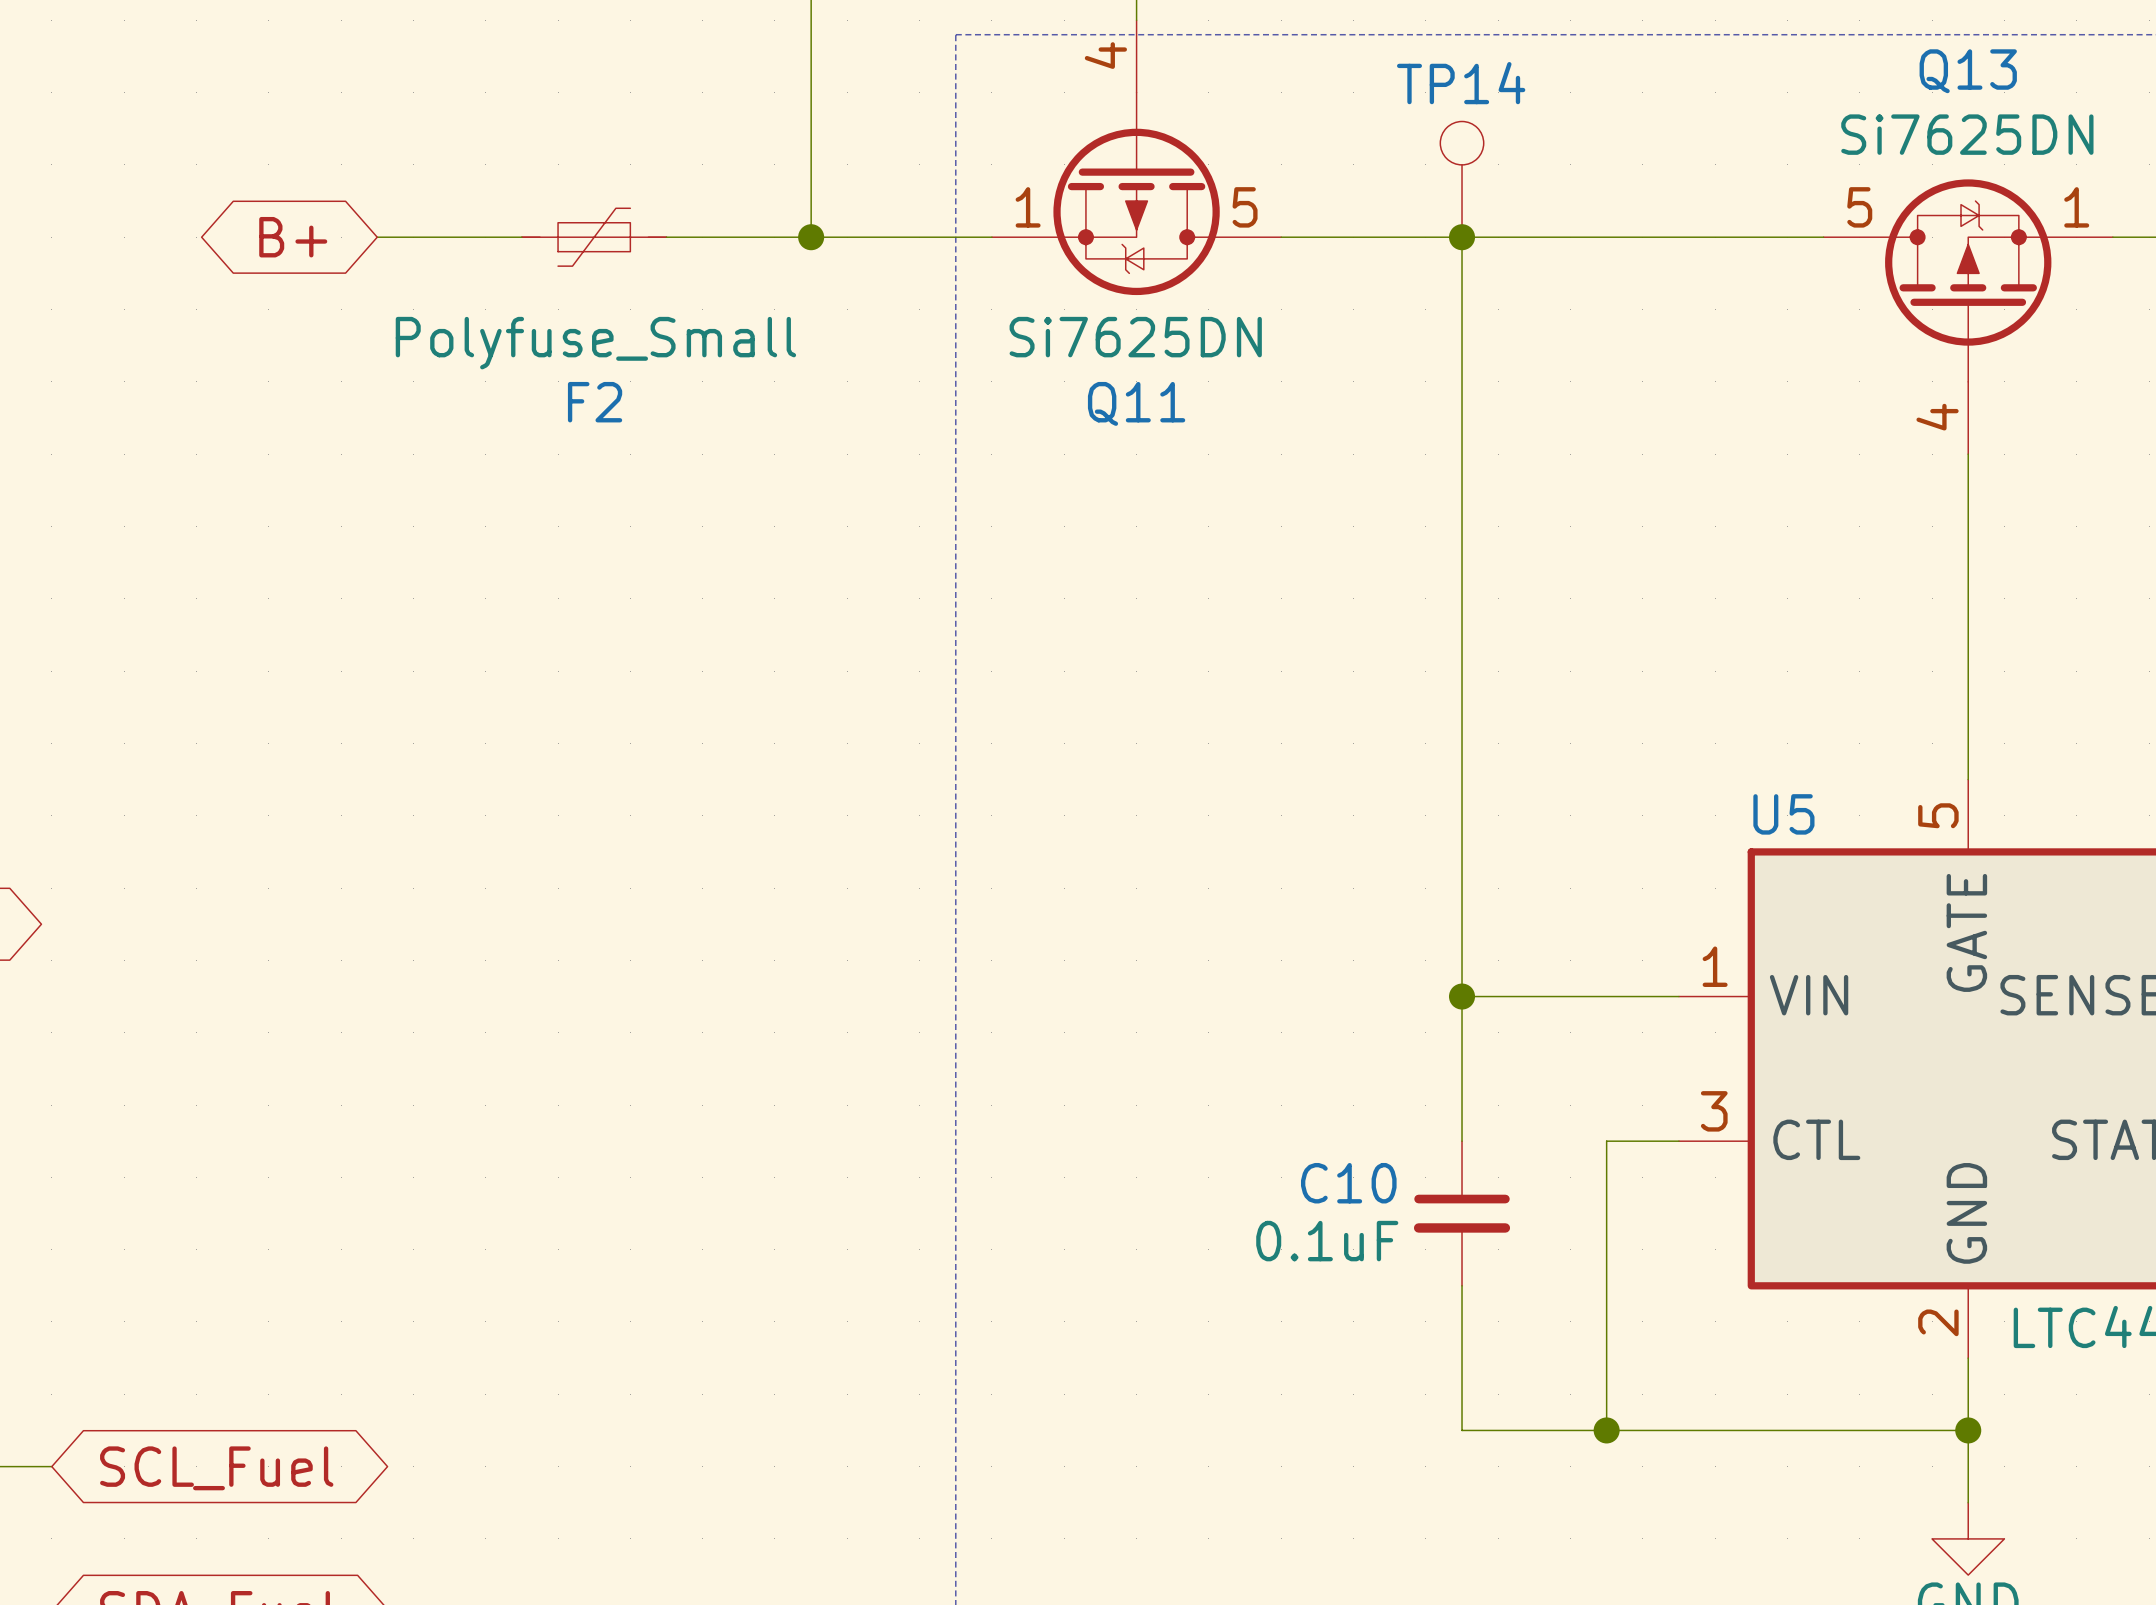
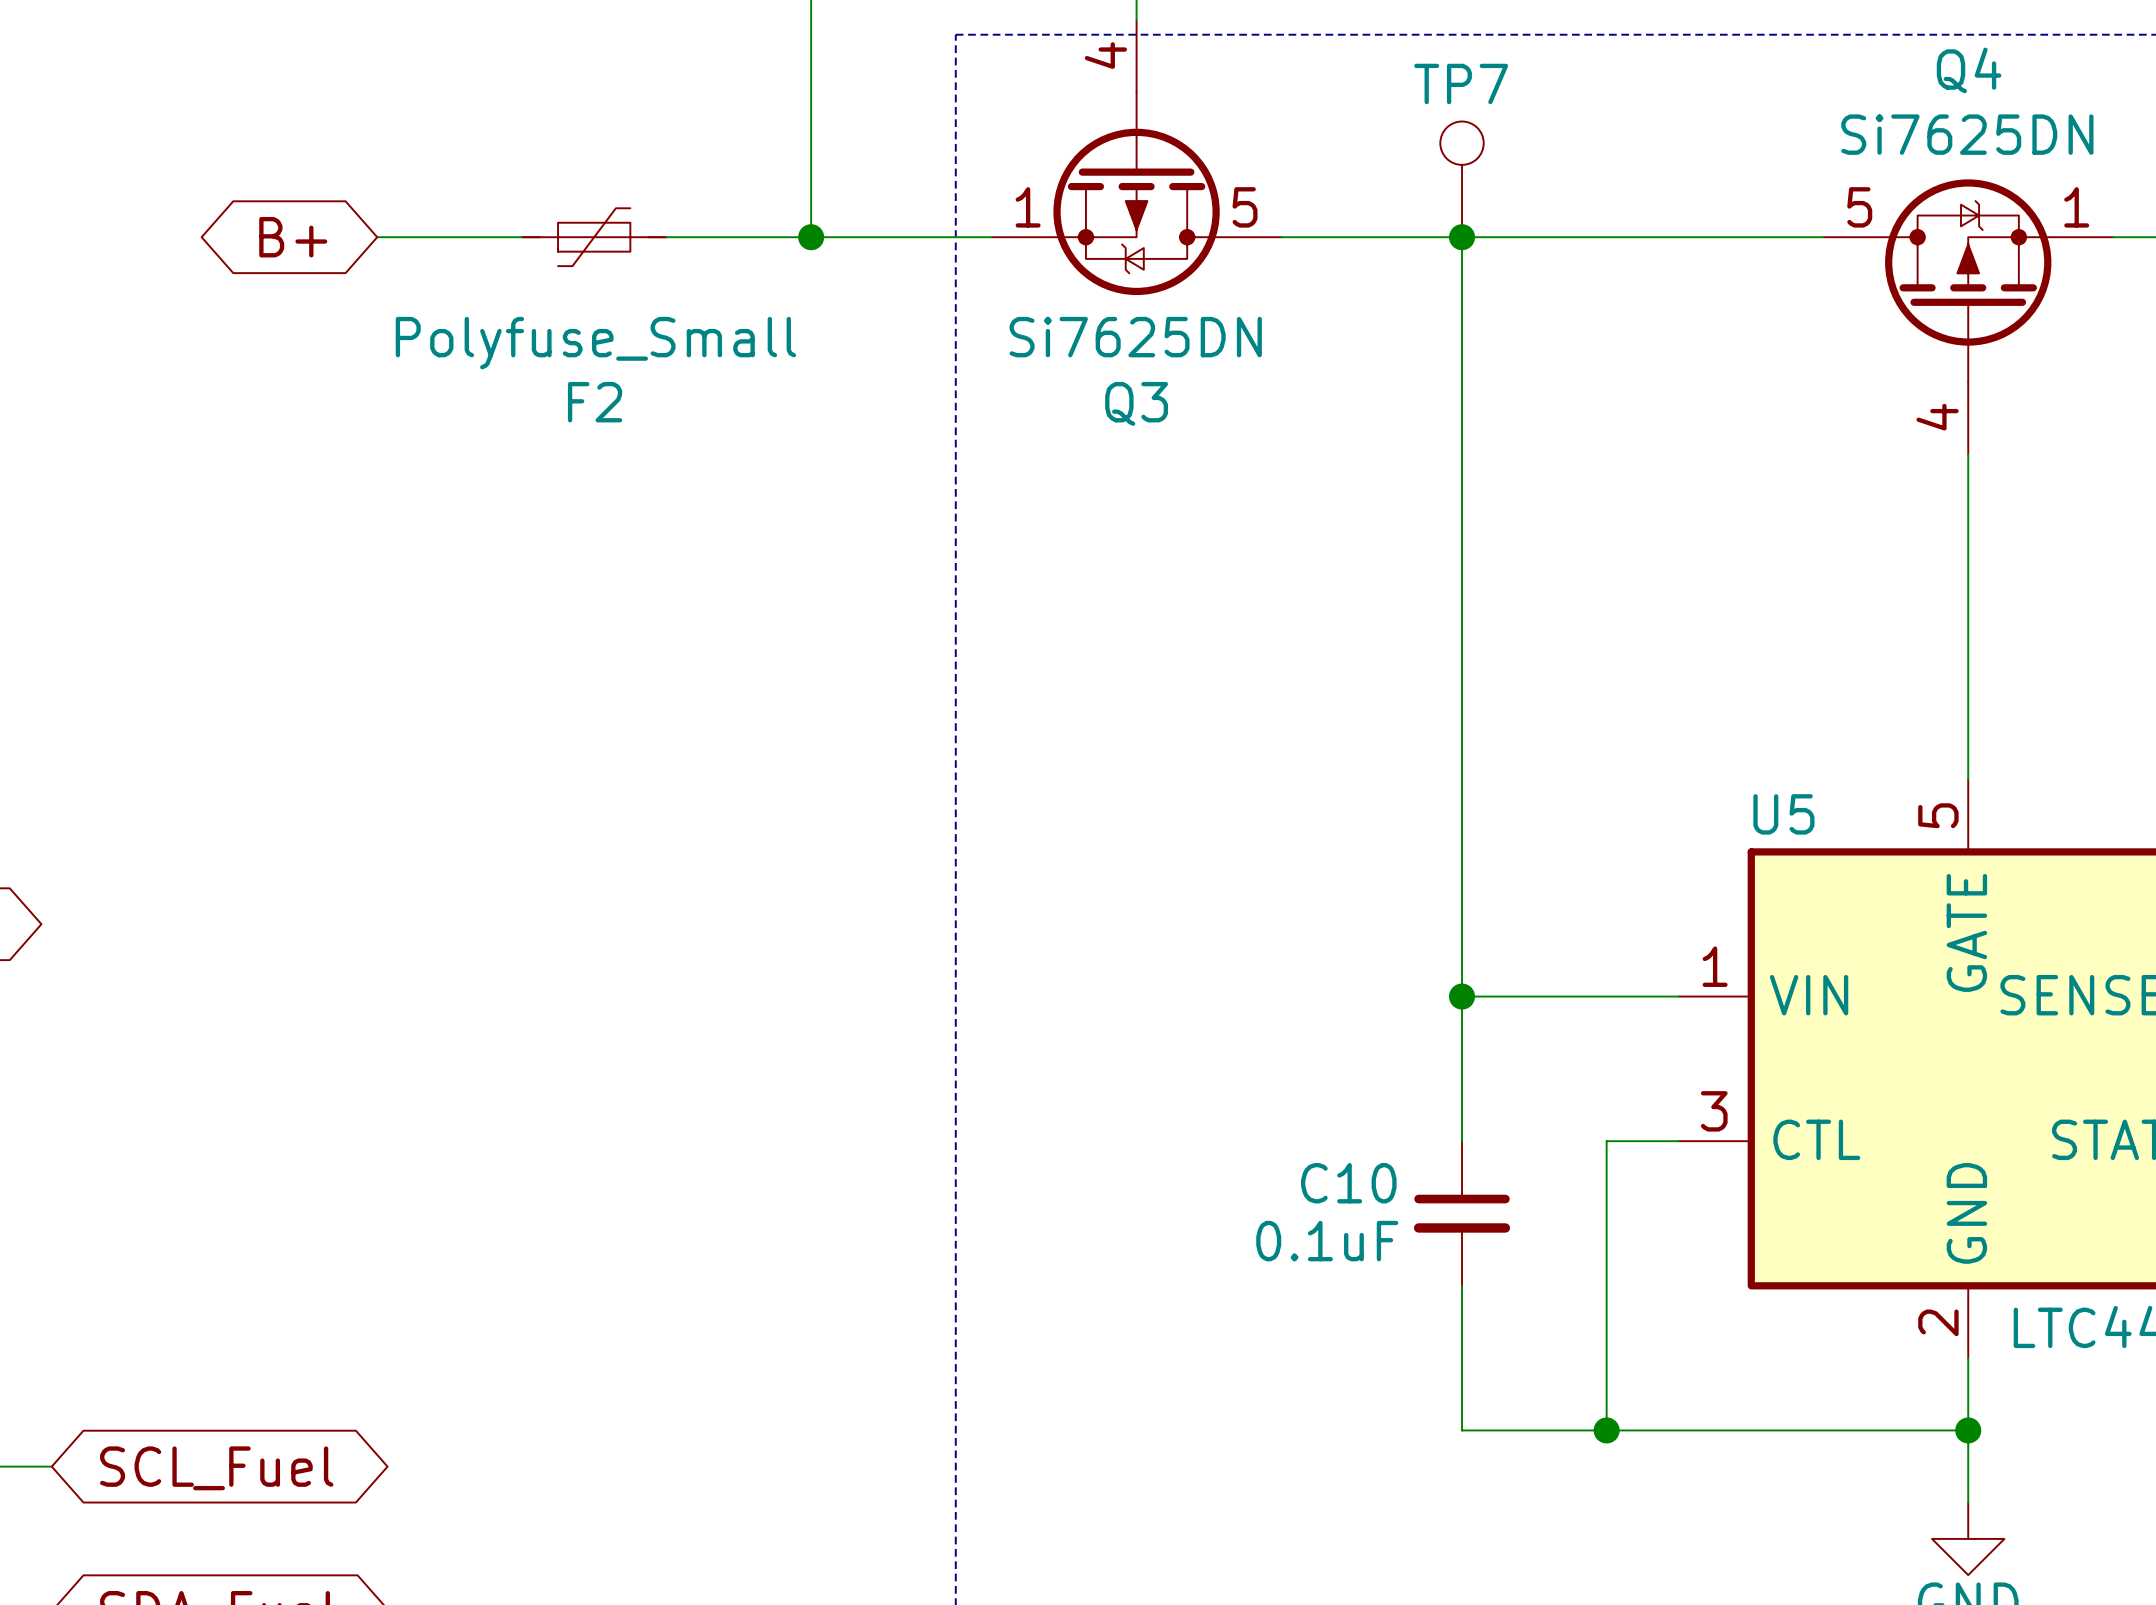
Q13 name: Q13 (1968, 71) -> Q4 (1969, 70)
TP14 name: TP14 (1461, 83) -> TP7 (1461, 83)
Q11 name: Q11 (1136, 403) -> Q3 (1136, 403)

